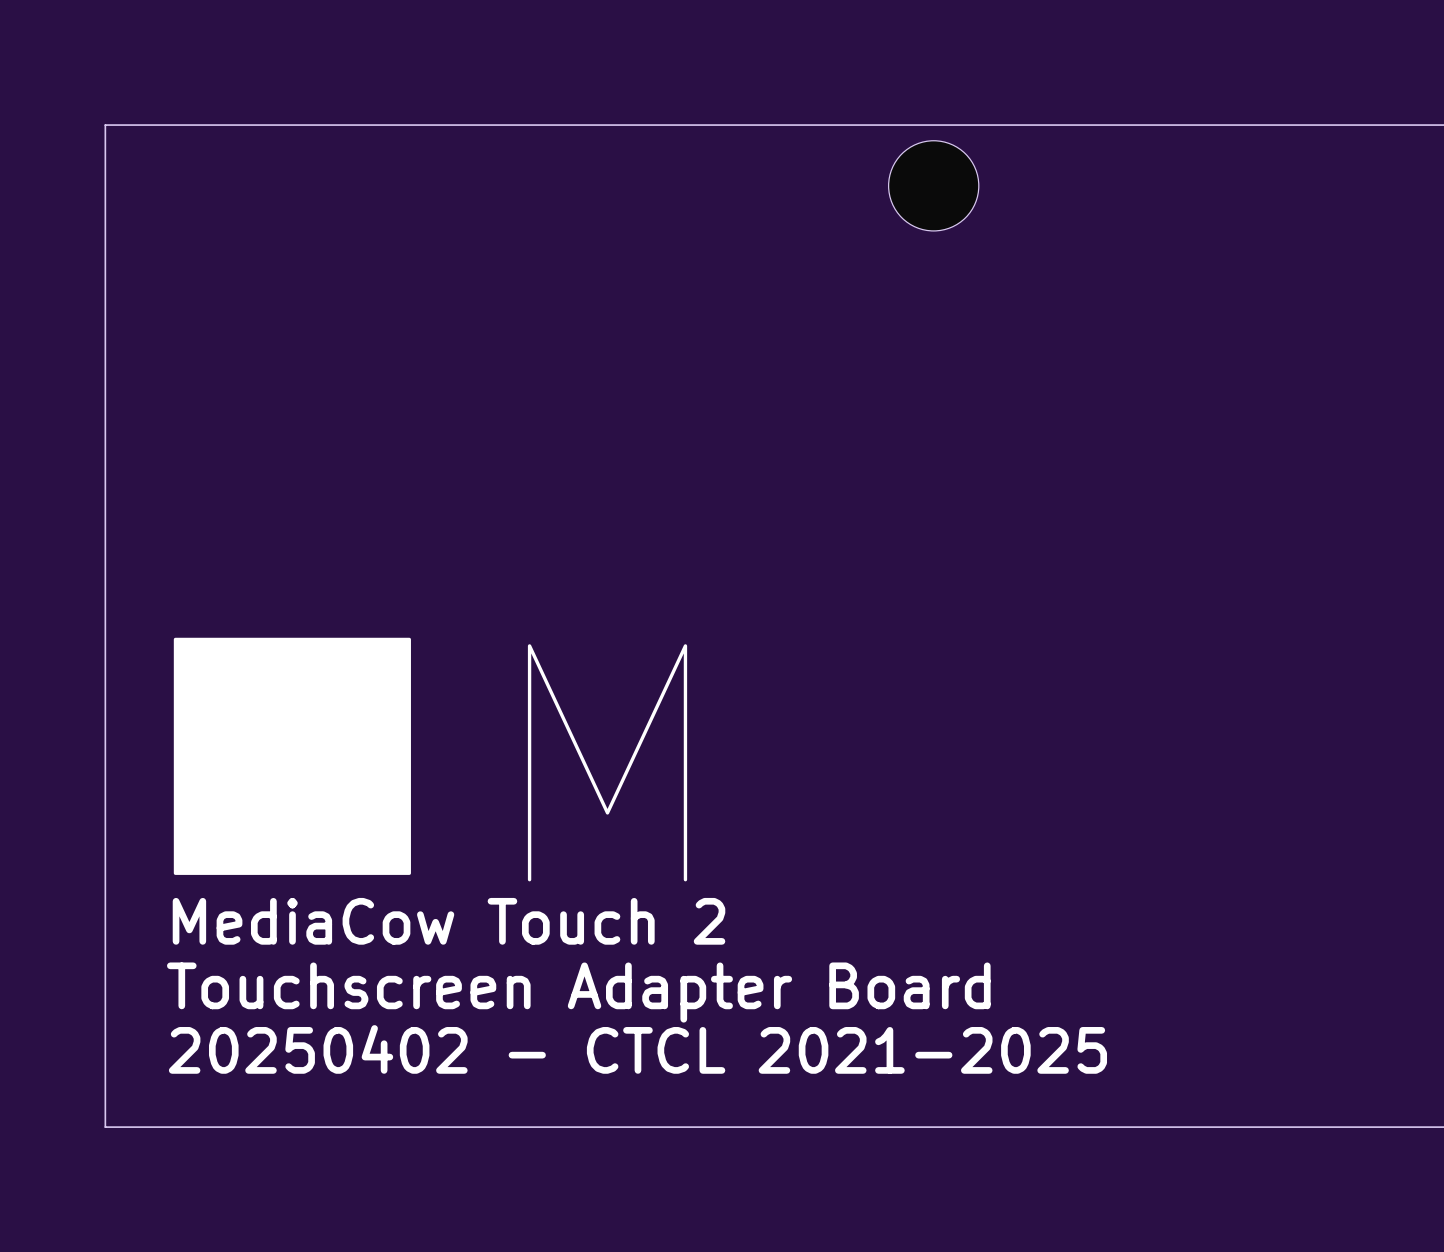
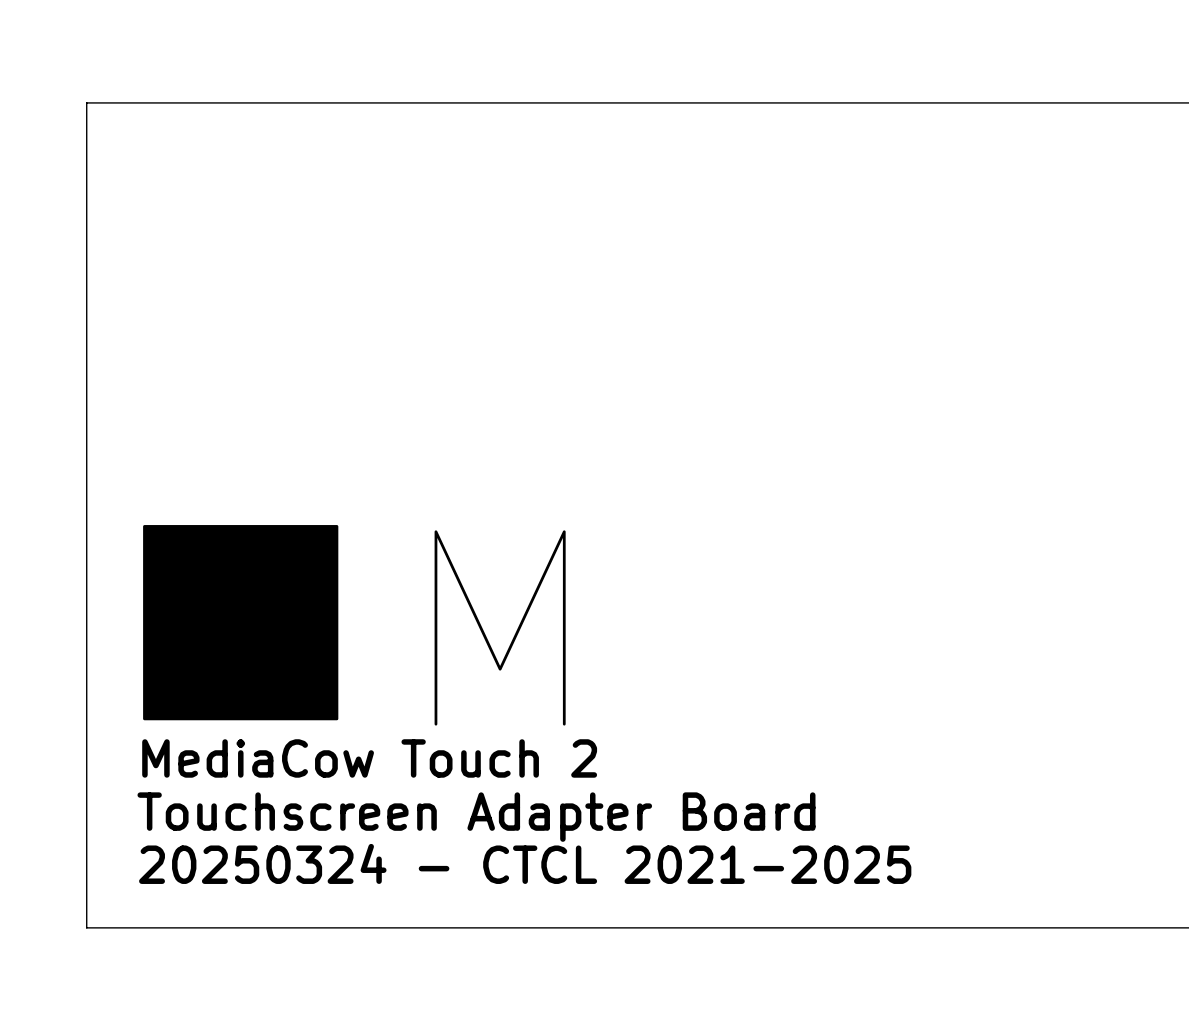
part: (933, 185) -> none
text: 20250402 - CTCL 2021-2025 (637, 1049) -> 20250324 - CTCL 2021-2025 (525, 863)

